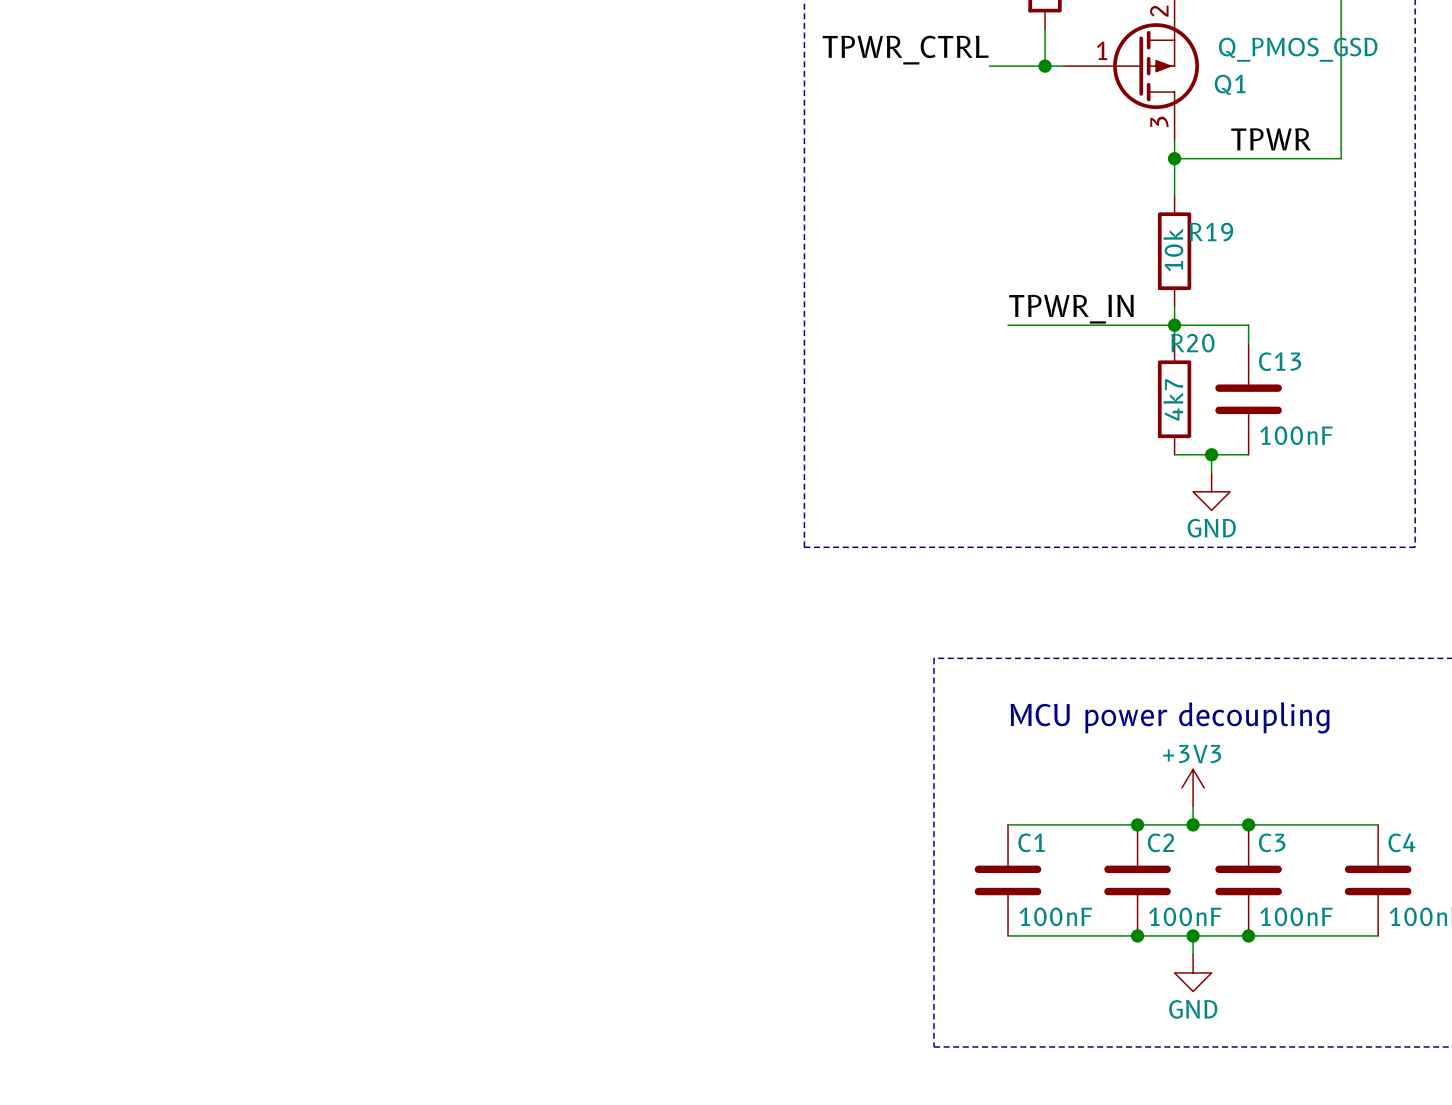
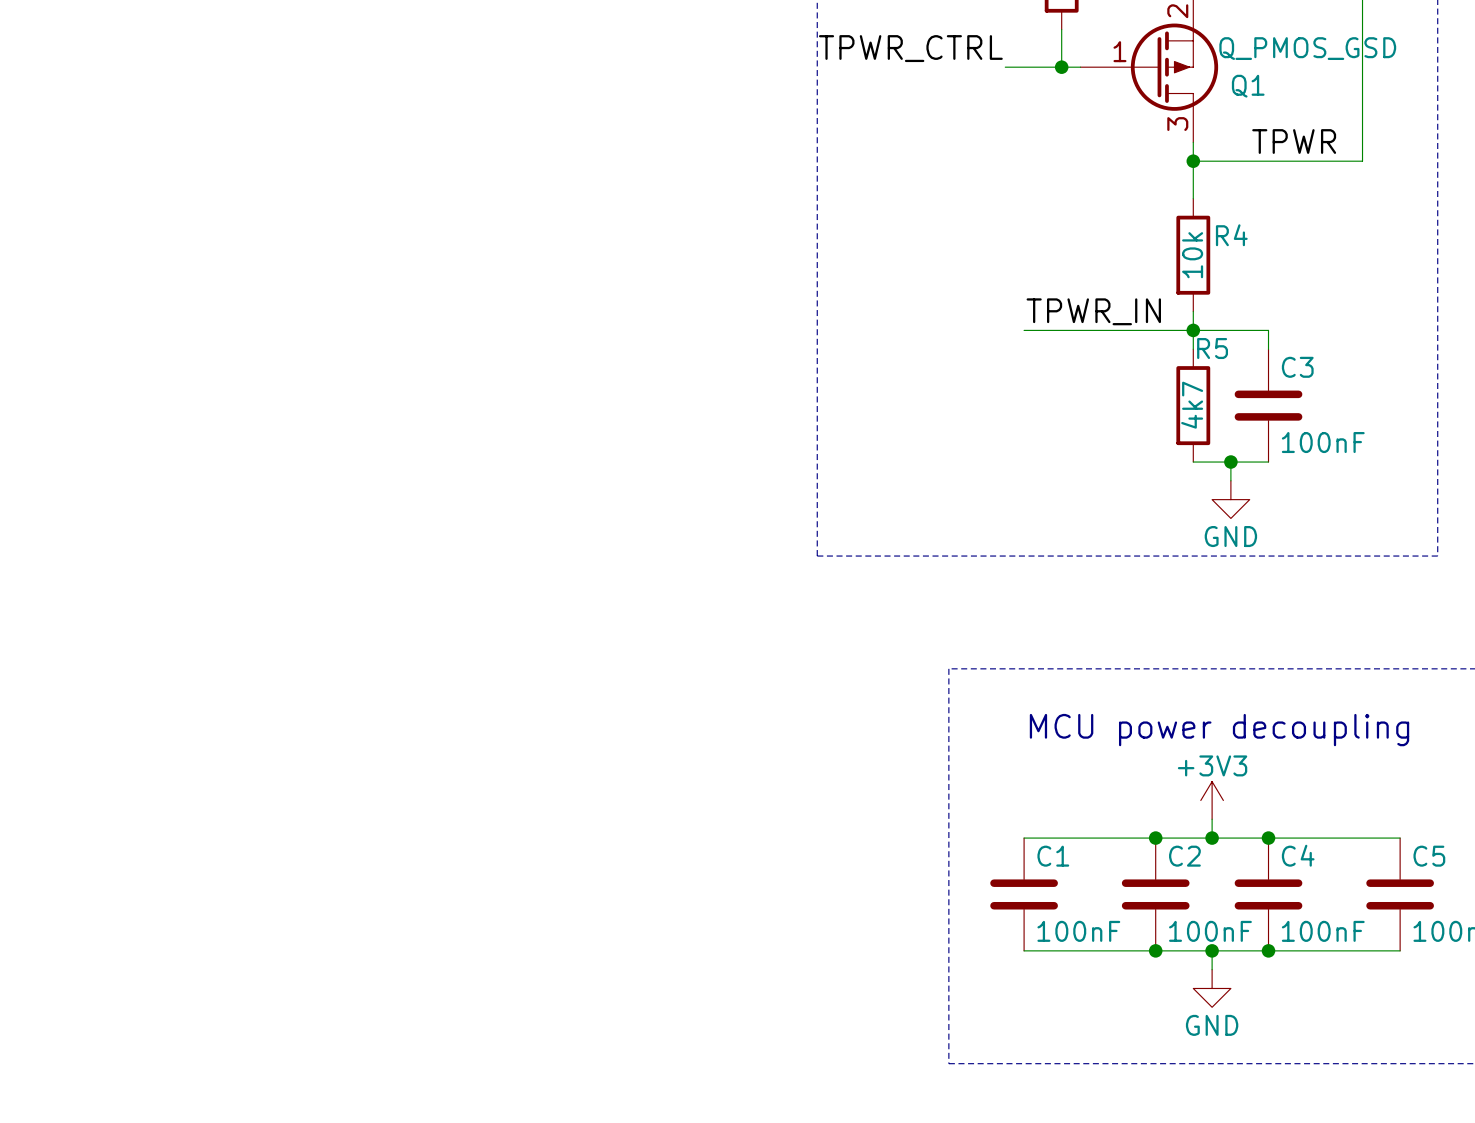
R19 name: R19 (1211, 232) -> R4 (1231, 235)
R20 name: R20 (1192, 343) -> R5 (1212, 348)
C13 name: C13 (1280, 361) -> C3 (1297, 367)
C3 name: C3 (1272, 842) -> C4 (1298, 855)
C4 name: C4 (1401, 842) -> C5 (1429, 856)

